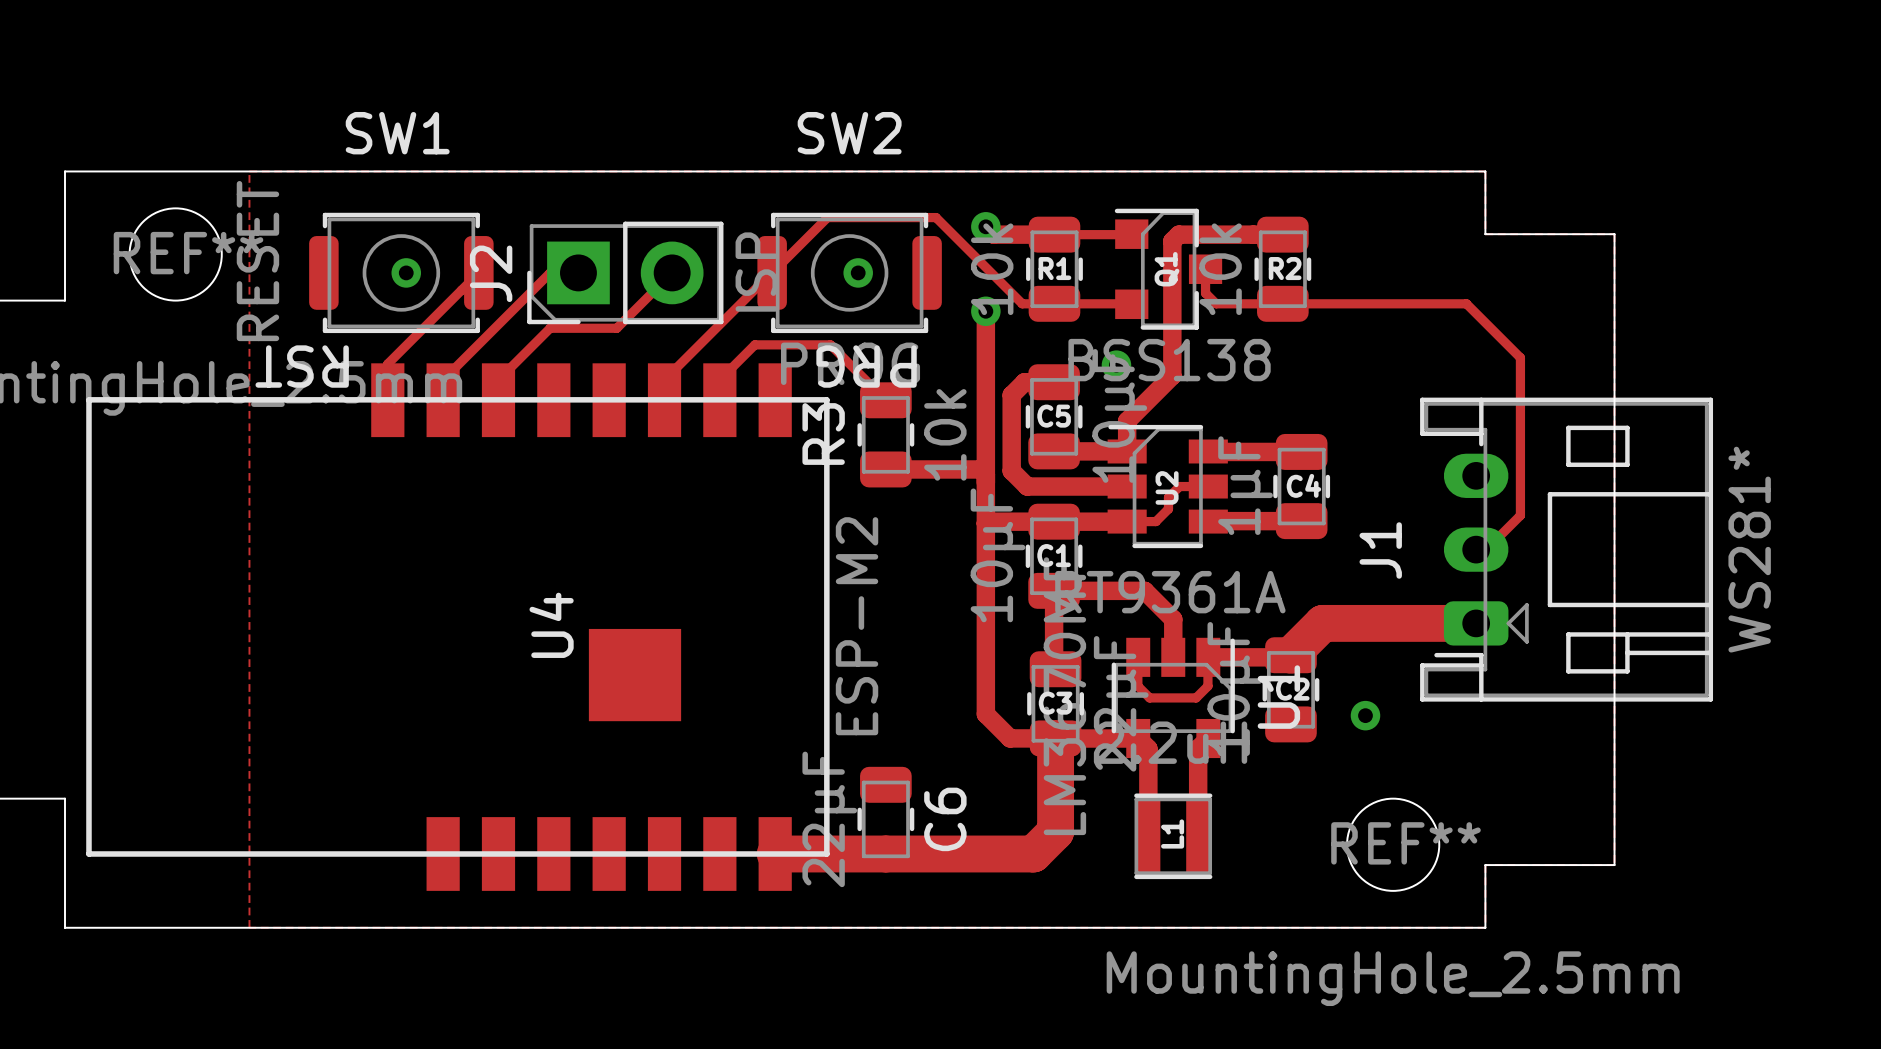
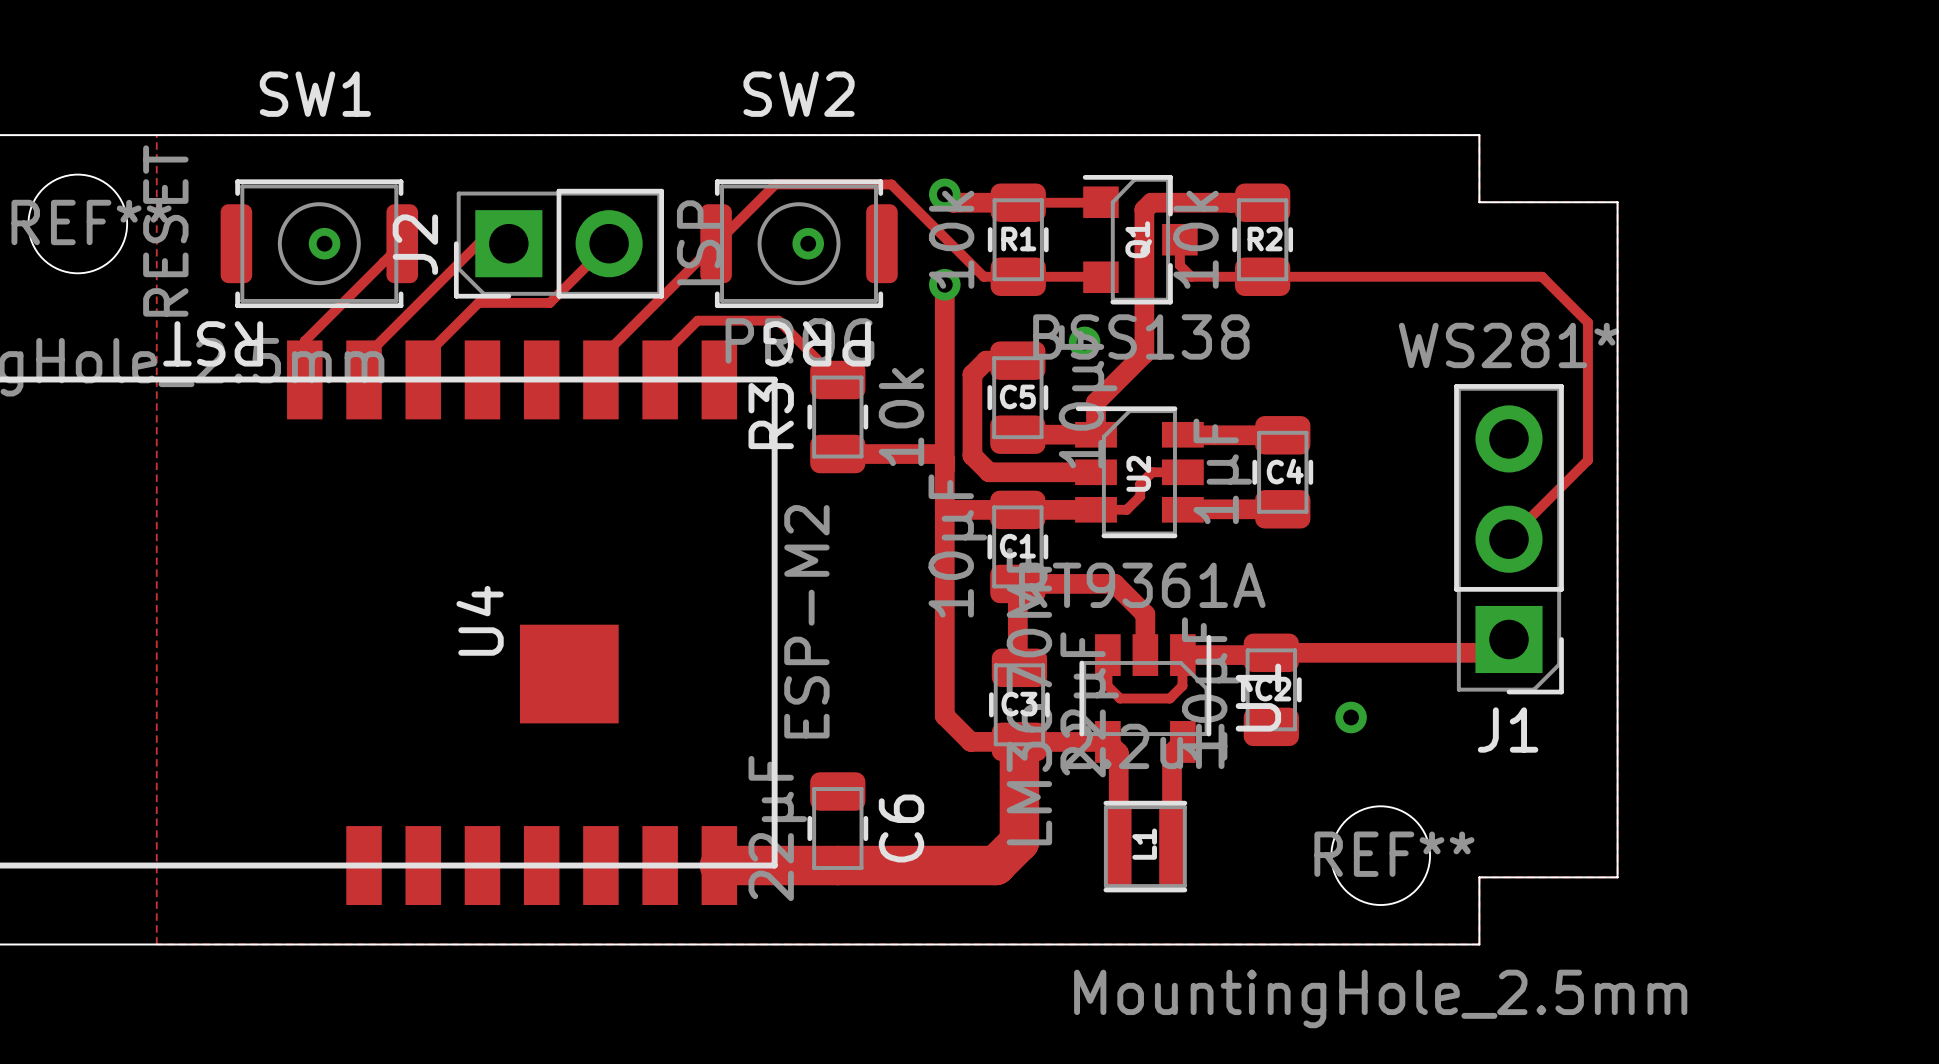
track: (1466, 303) (1520, 357) (1520, 515) (1486, 549) (1476, 549) -> (1459, 276) (1542, 276) (1587, 322) (1587, 460) (1509, 539)
J1 footprint: [1420, 397, 1714, 702] -> [1454, 384, 1564, 695]
J1 value position: WS281* (1749, 549) -> WS281* (1509, 345)
J1 name position: J1 (1380, 550) -> J1 (1508, 730)
track: (1476, 623) (1322, 623) (1290, 655) -> (1509, 639) (1495, 652) (1271, 652)

